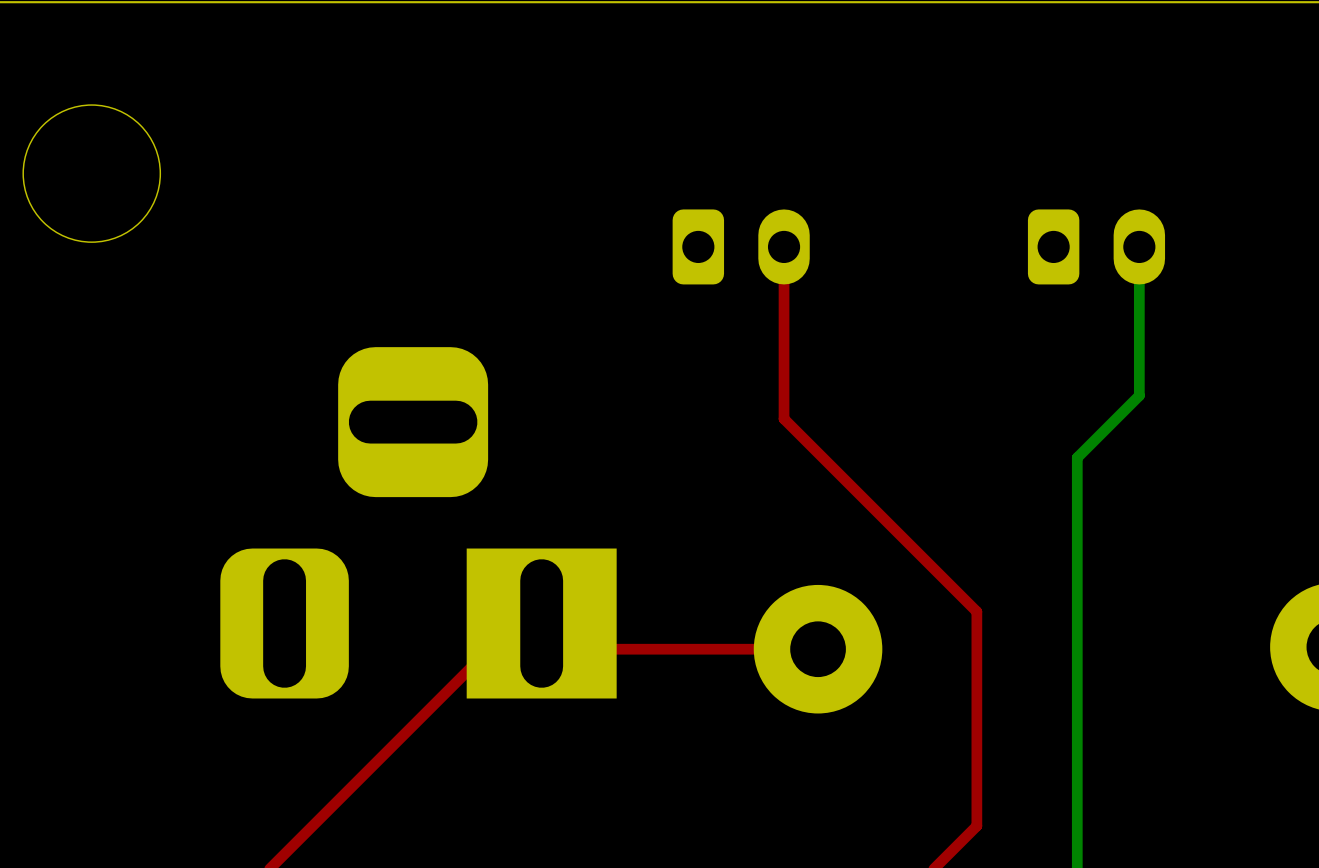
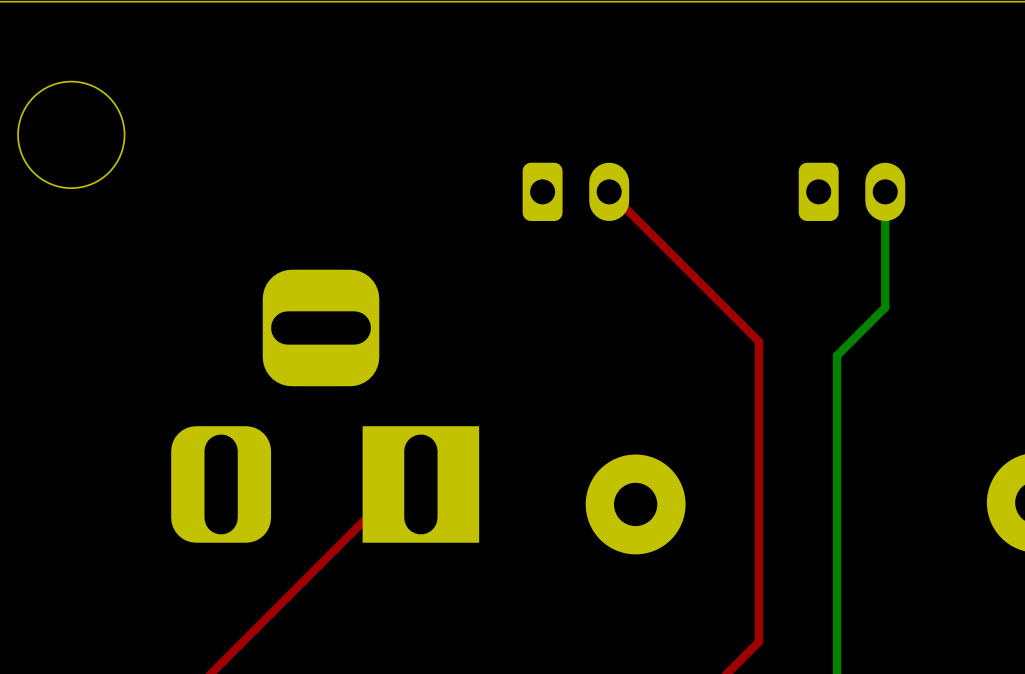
top track: (784, 246) (784, 418) (976, 611) -> (609, 191) (759, 341) (759, 475)
top track: (541, 623) (567, 649) (818, 649) -> none

